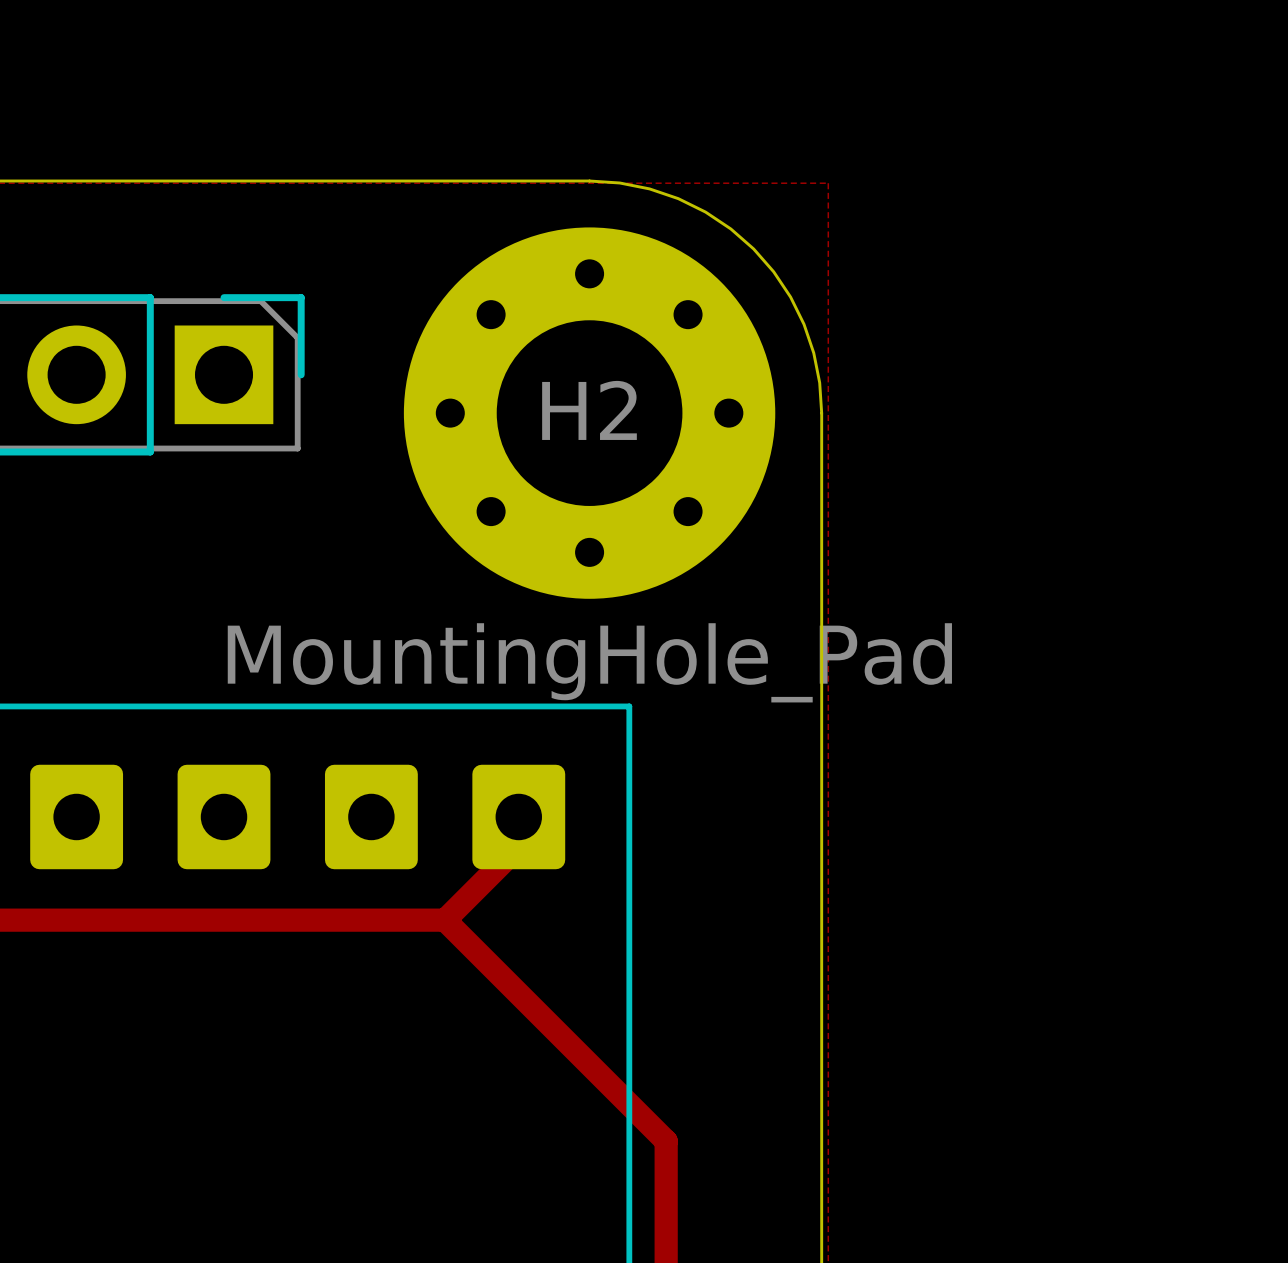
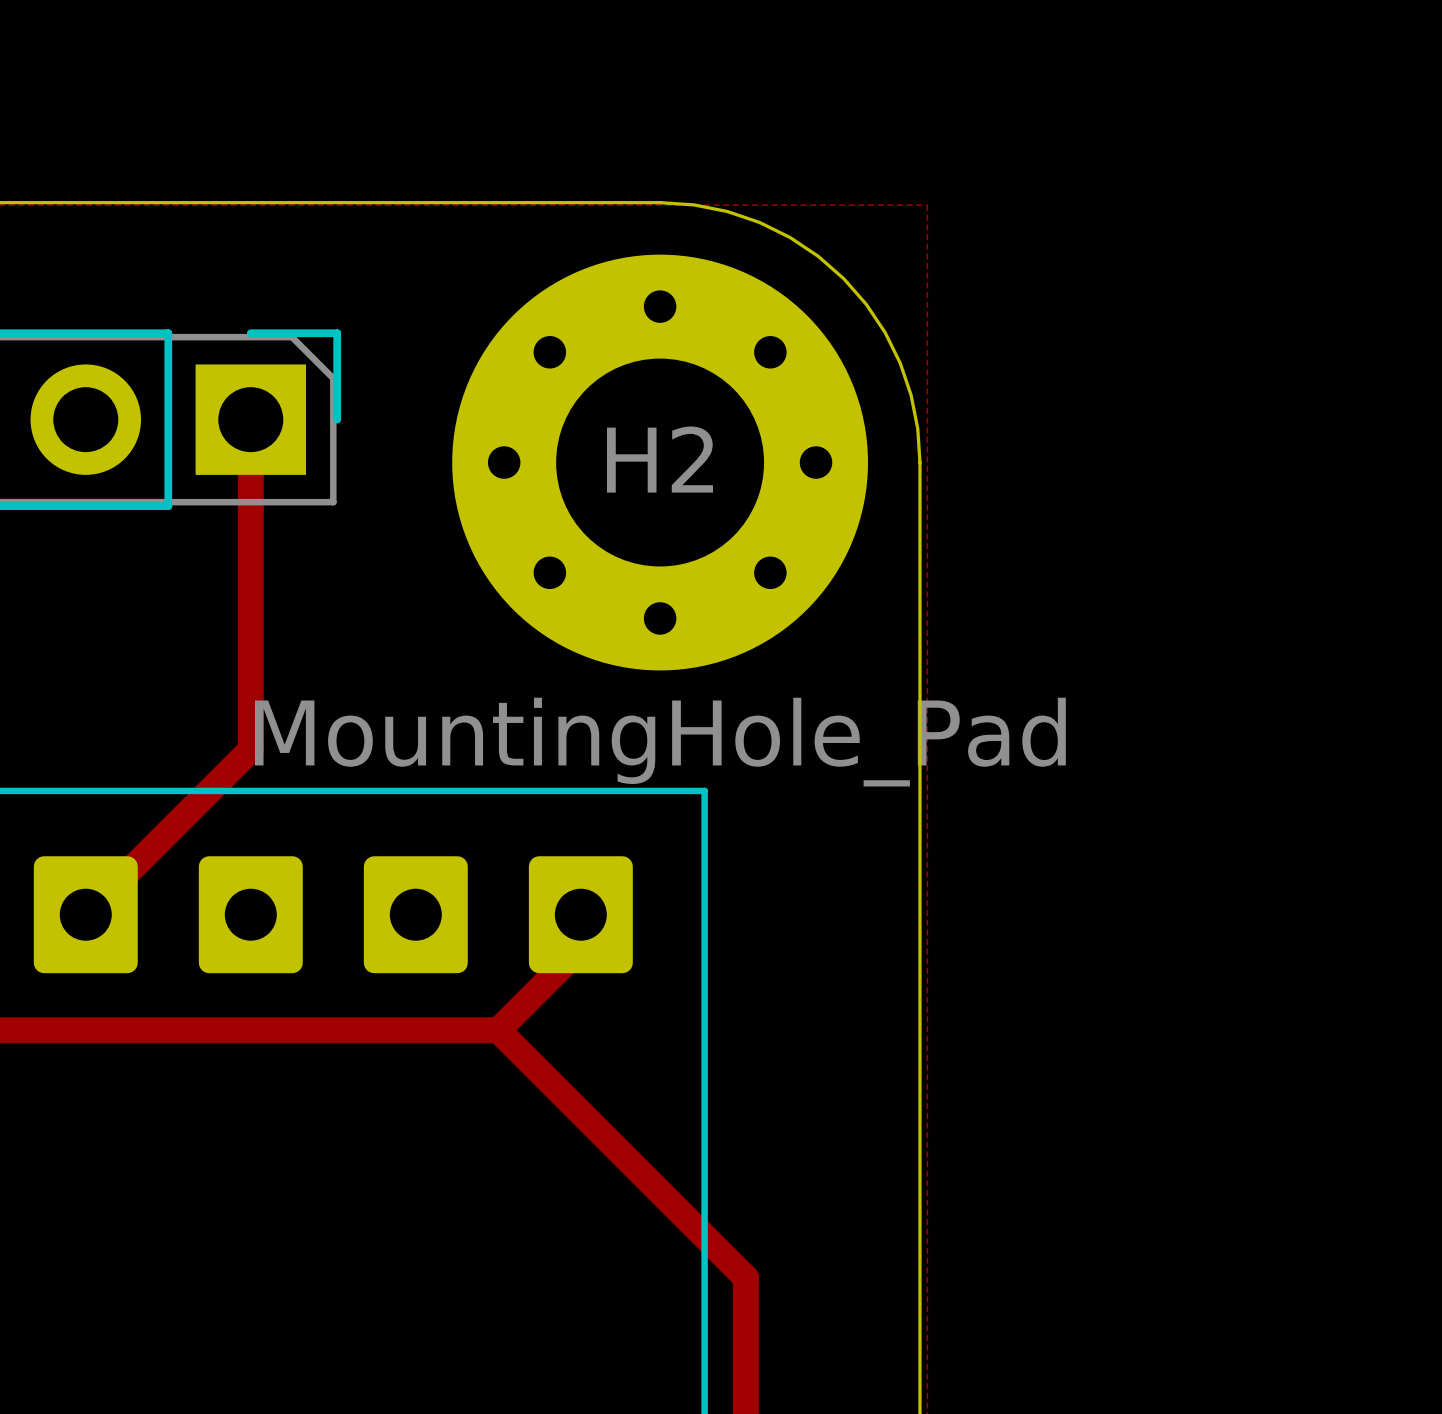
track: none -> (250, 419) (250, 749) (85, 914)

